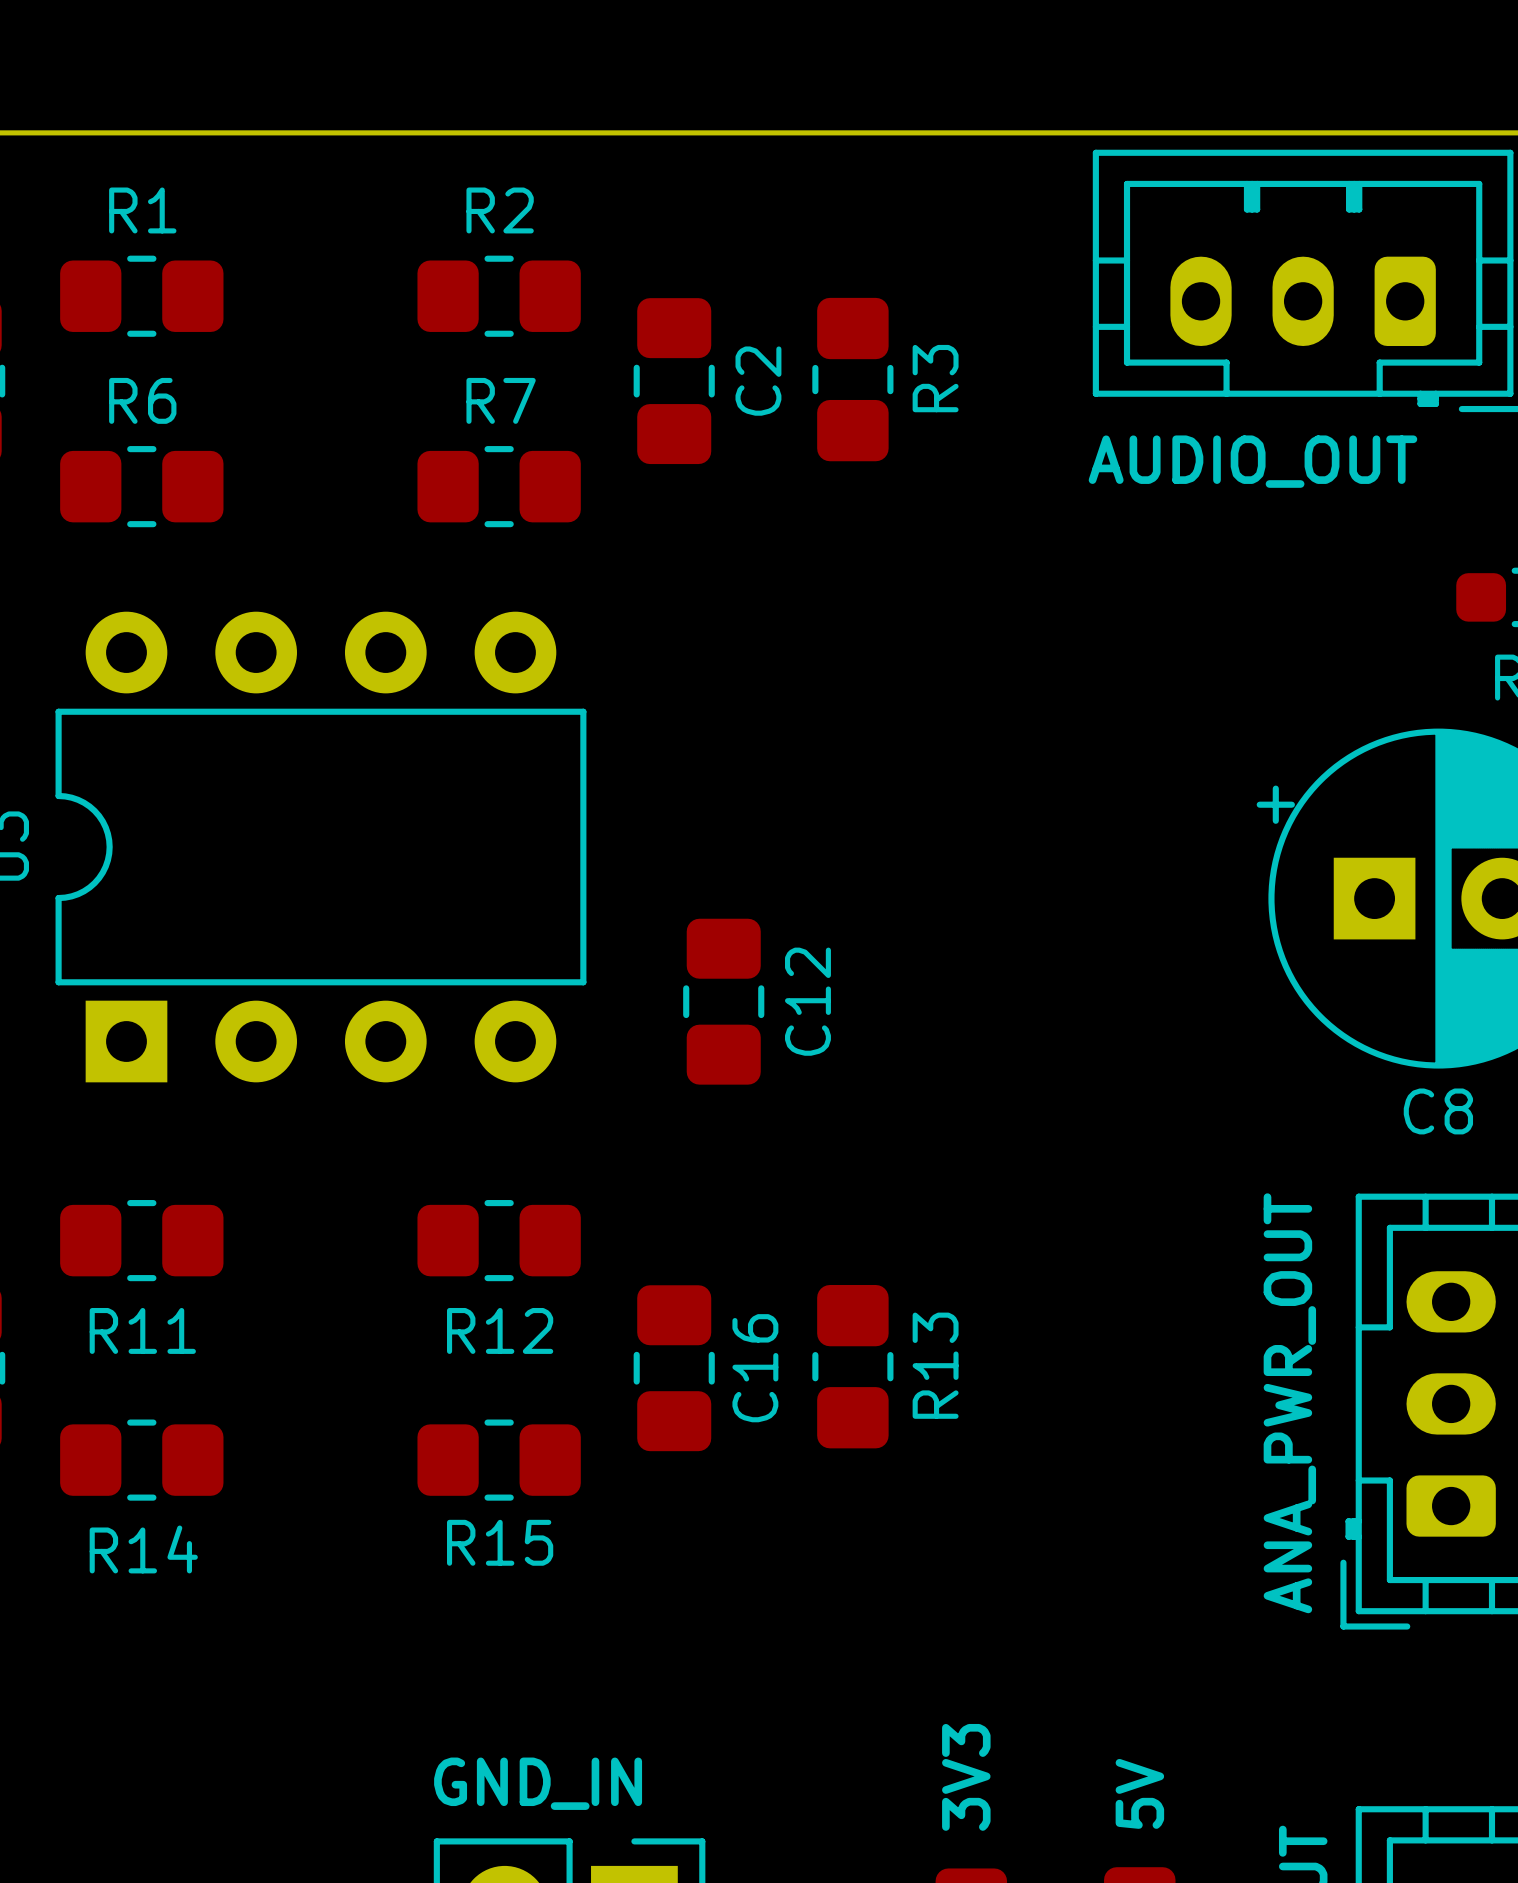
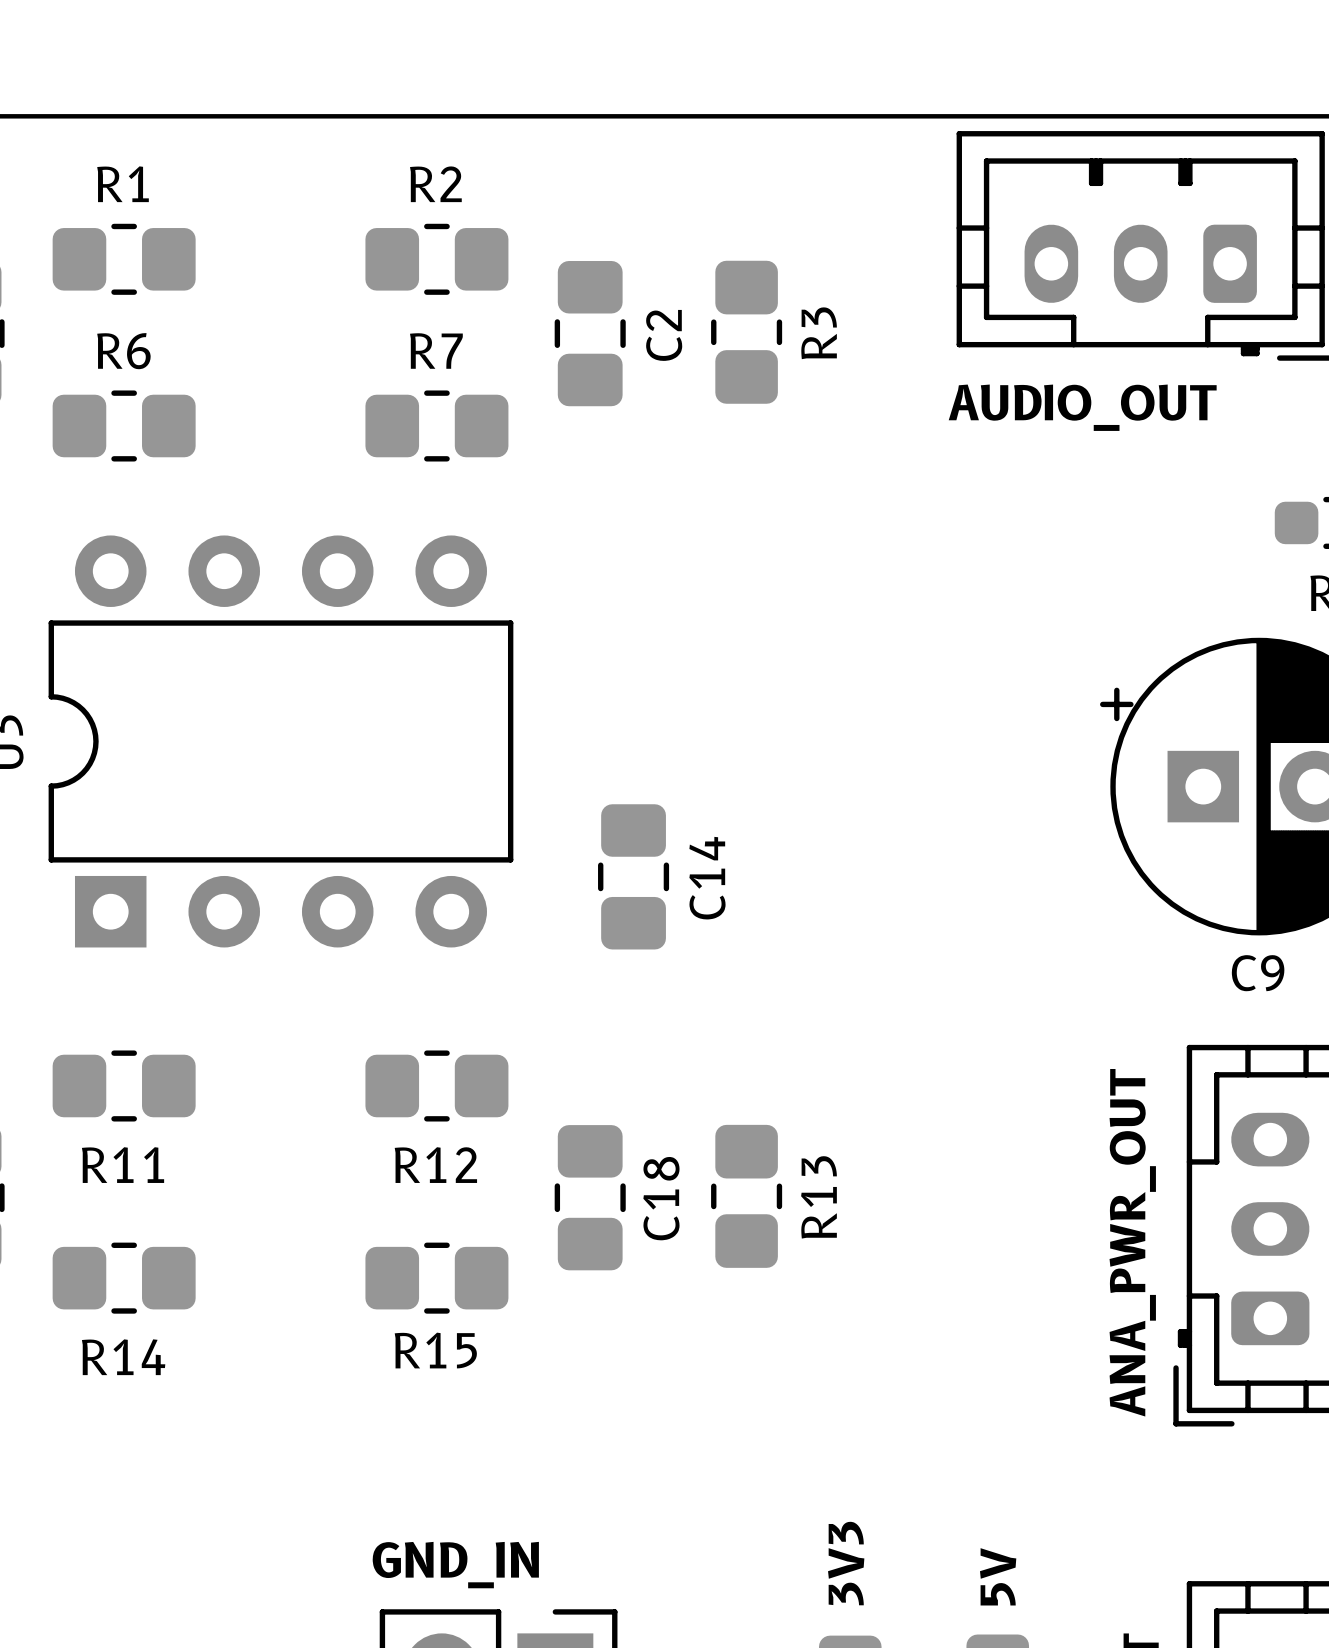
C12 name: C12 (807, 1001) -> C14 (707, 878)
C8 name: C8 (1438, 1111) -> C9 (1258, 973)
C16 name: C16 (755, 1368) -> C18 (661, 1198)

